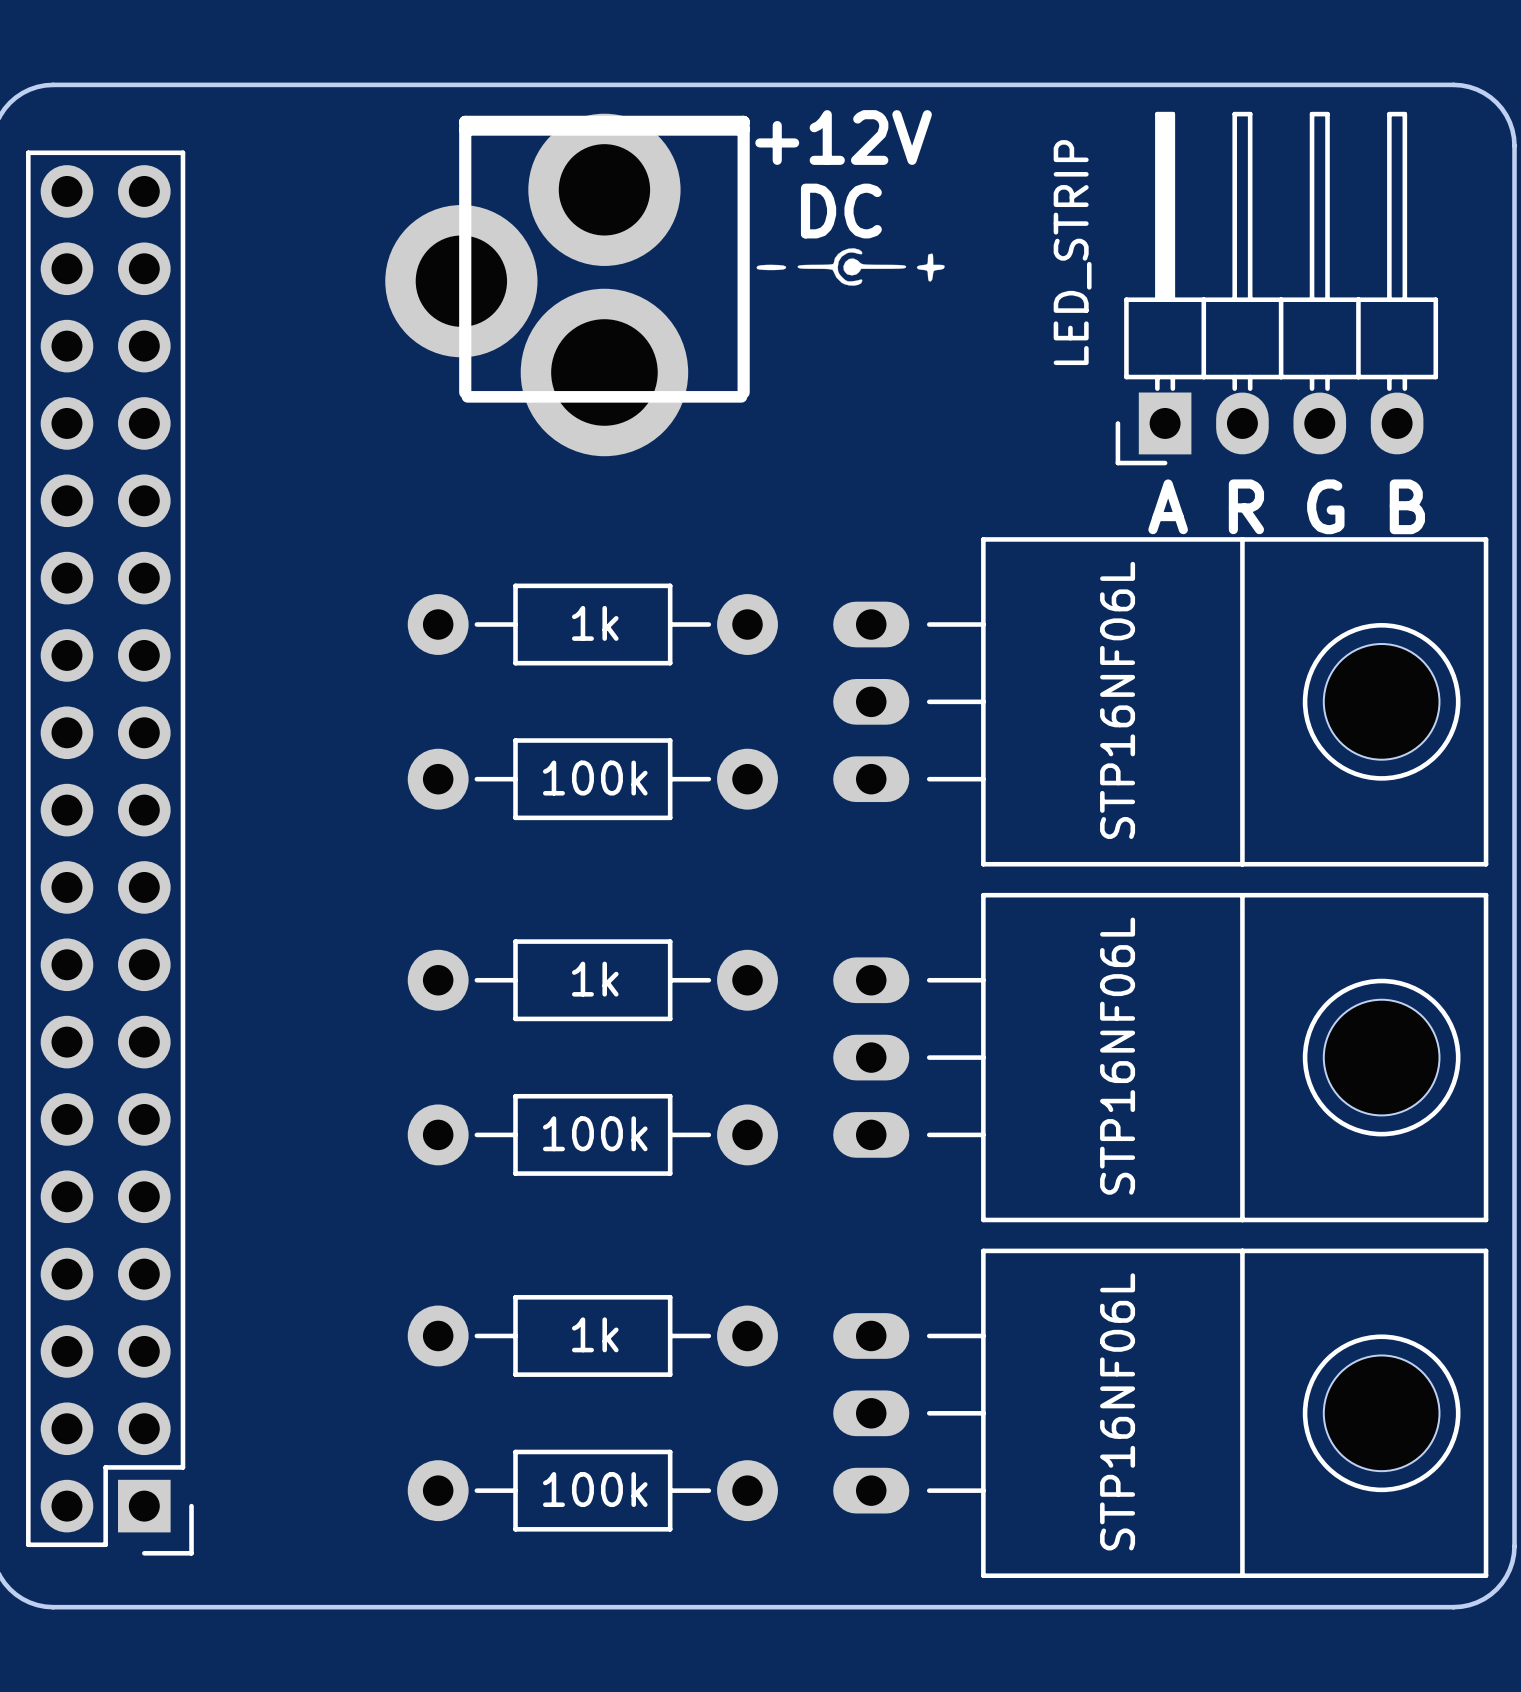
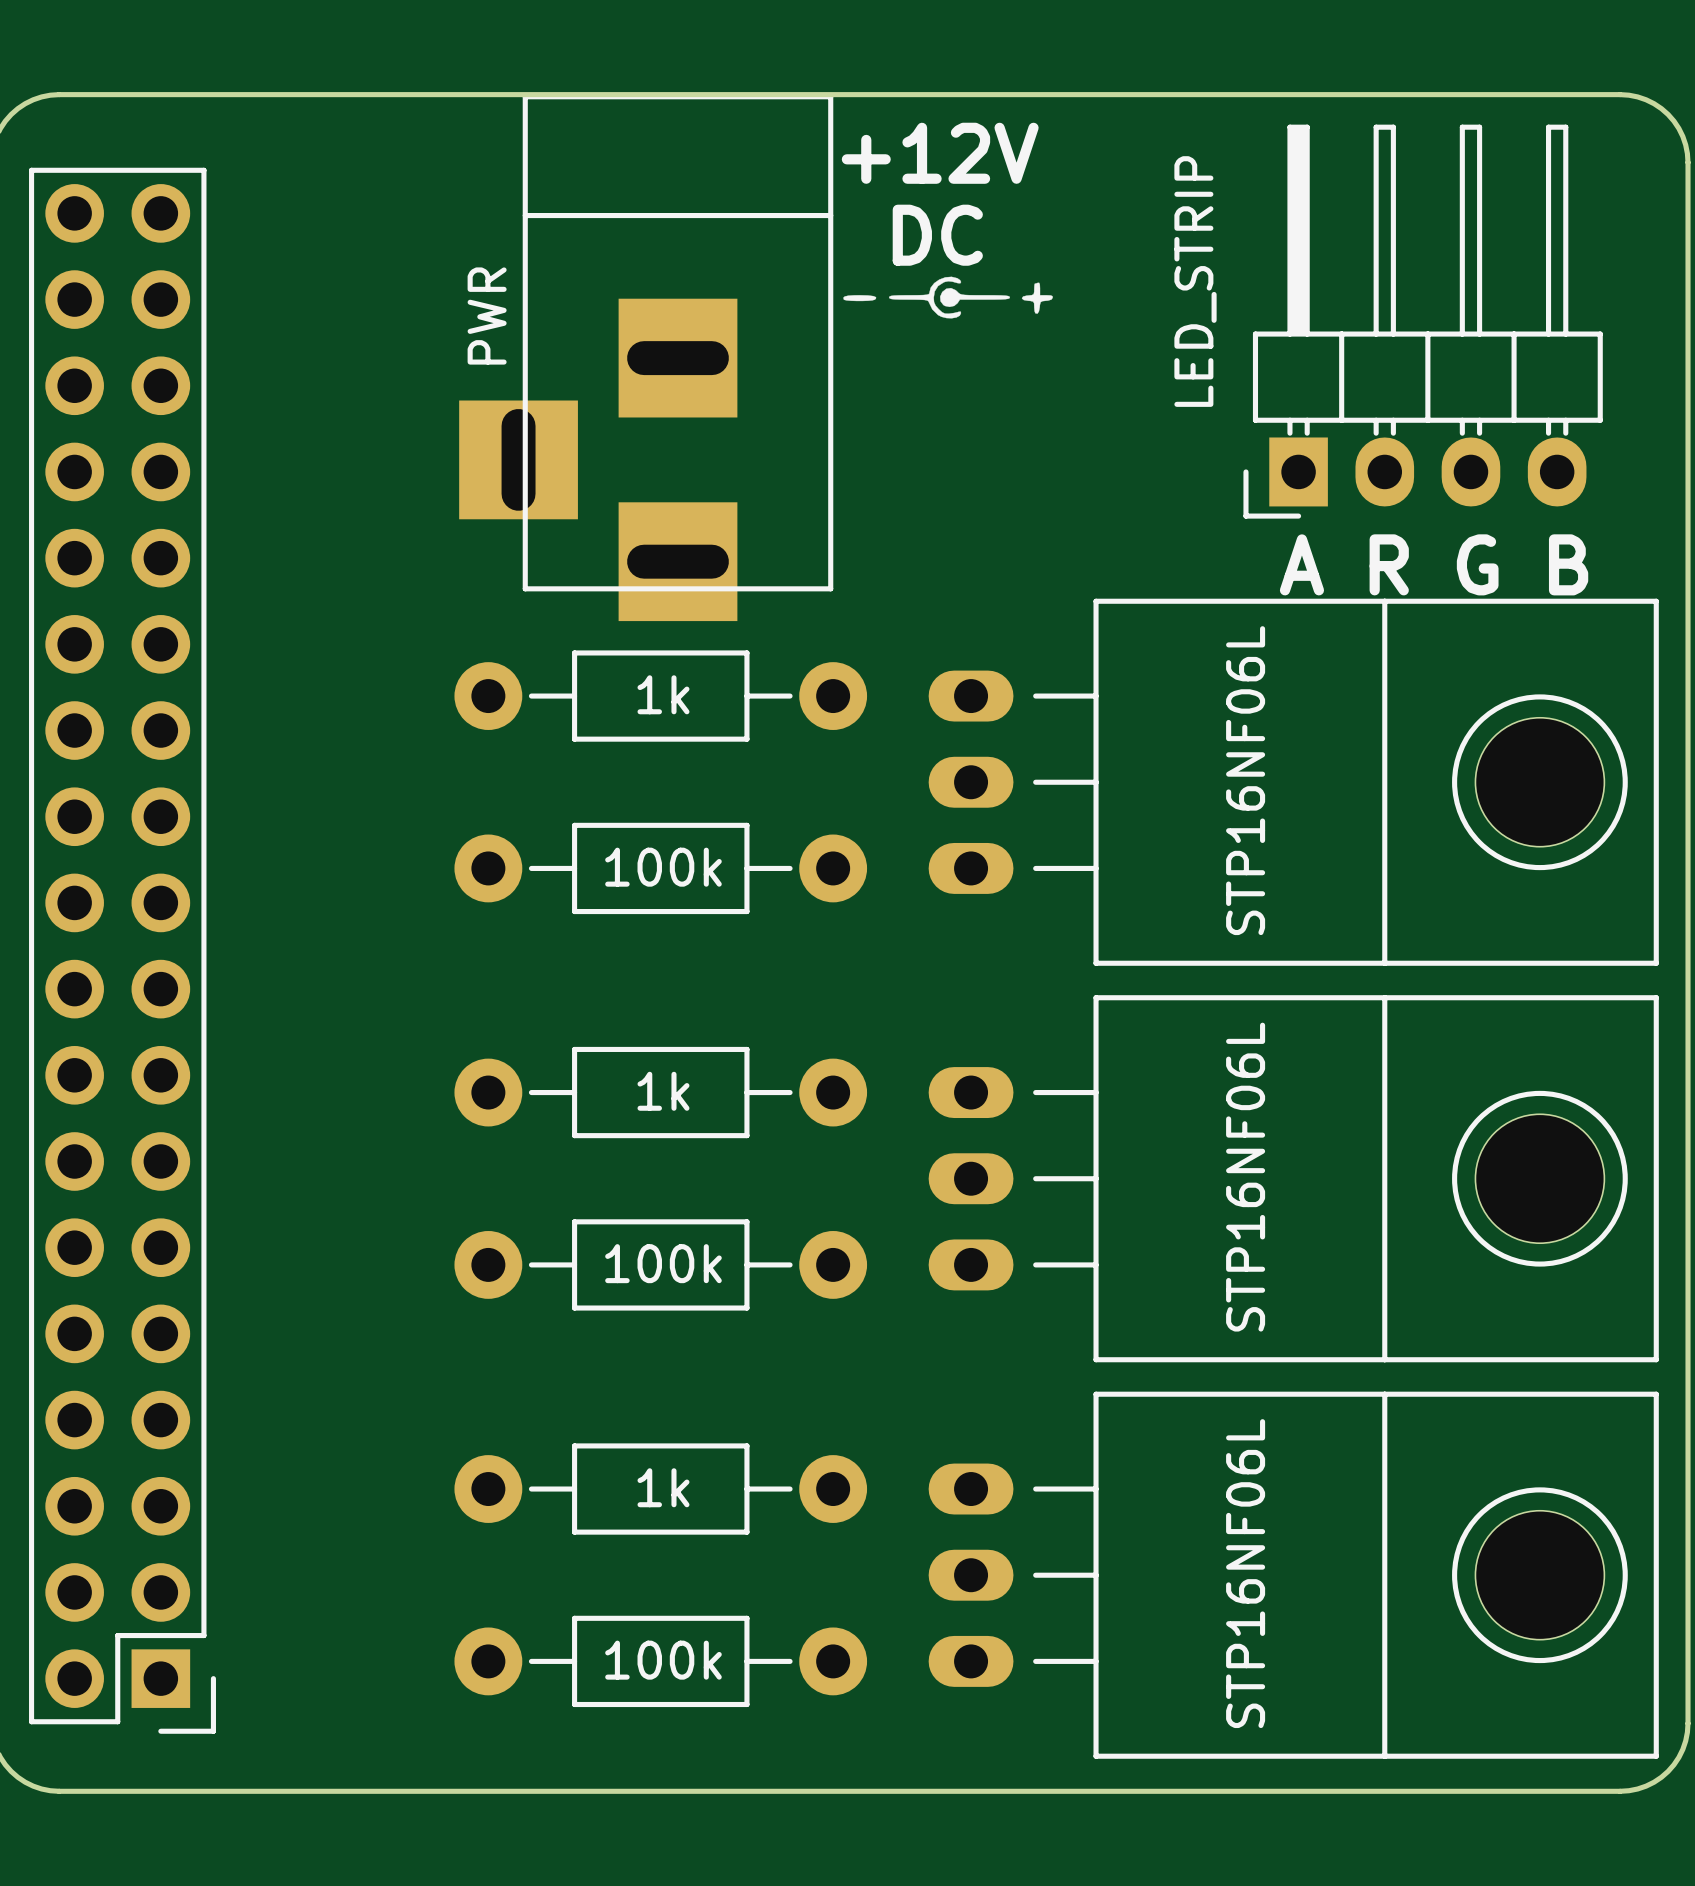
part: (567, 284) -> none
part: none -> PWR (646, 357)

